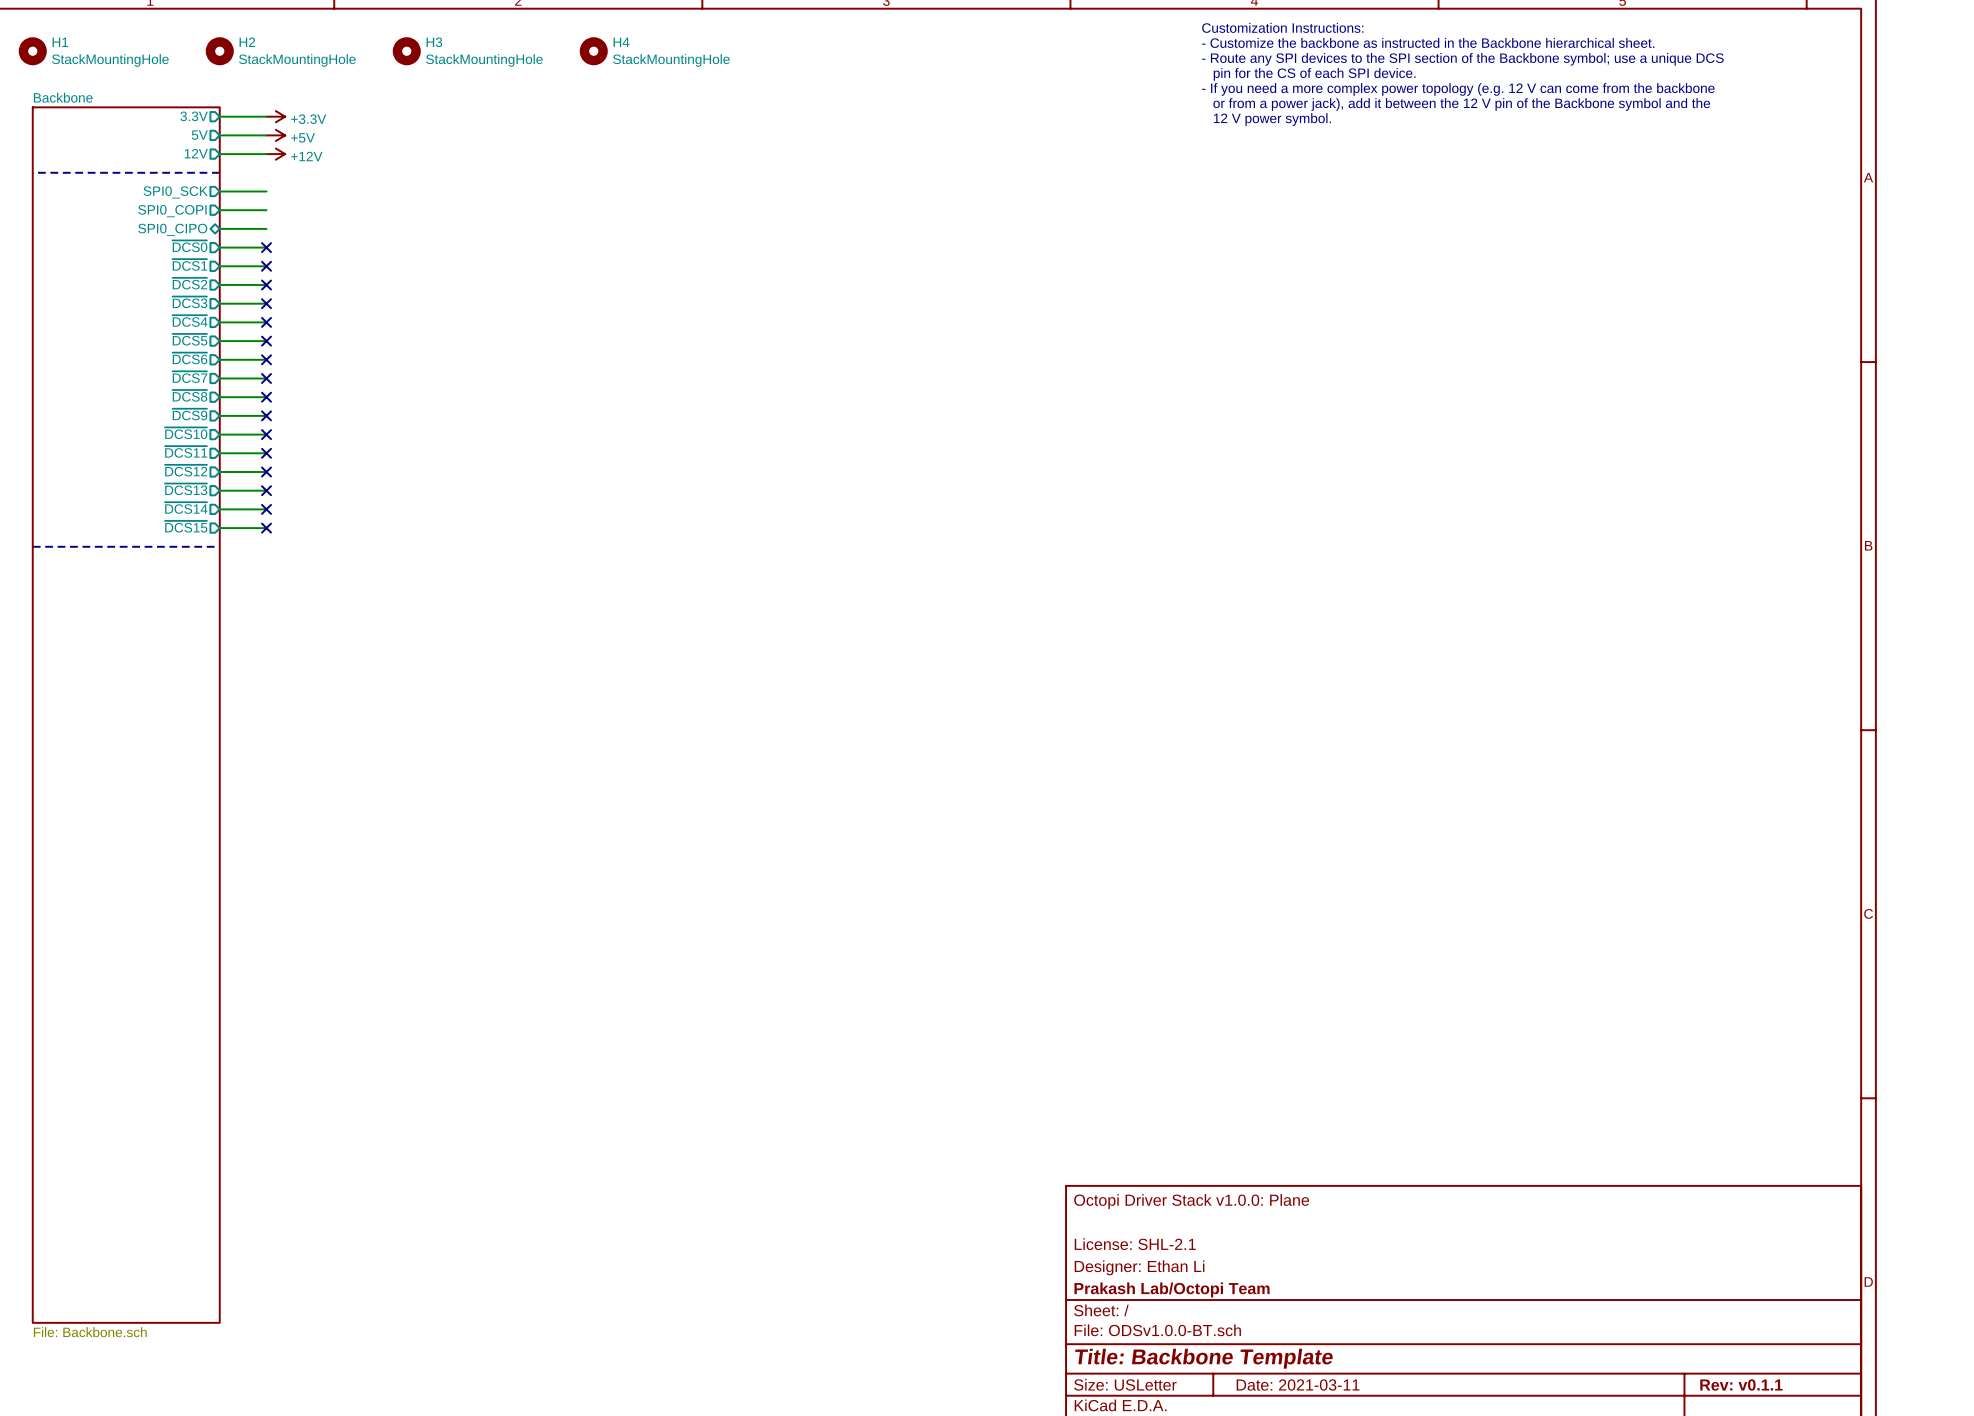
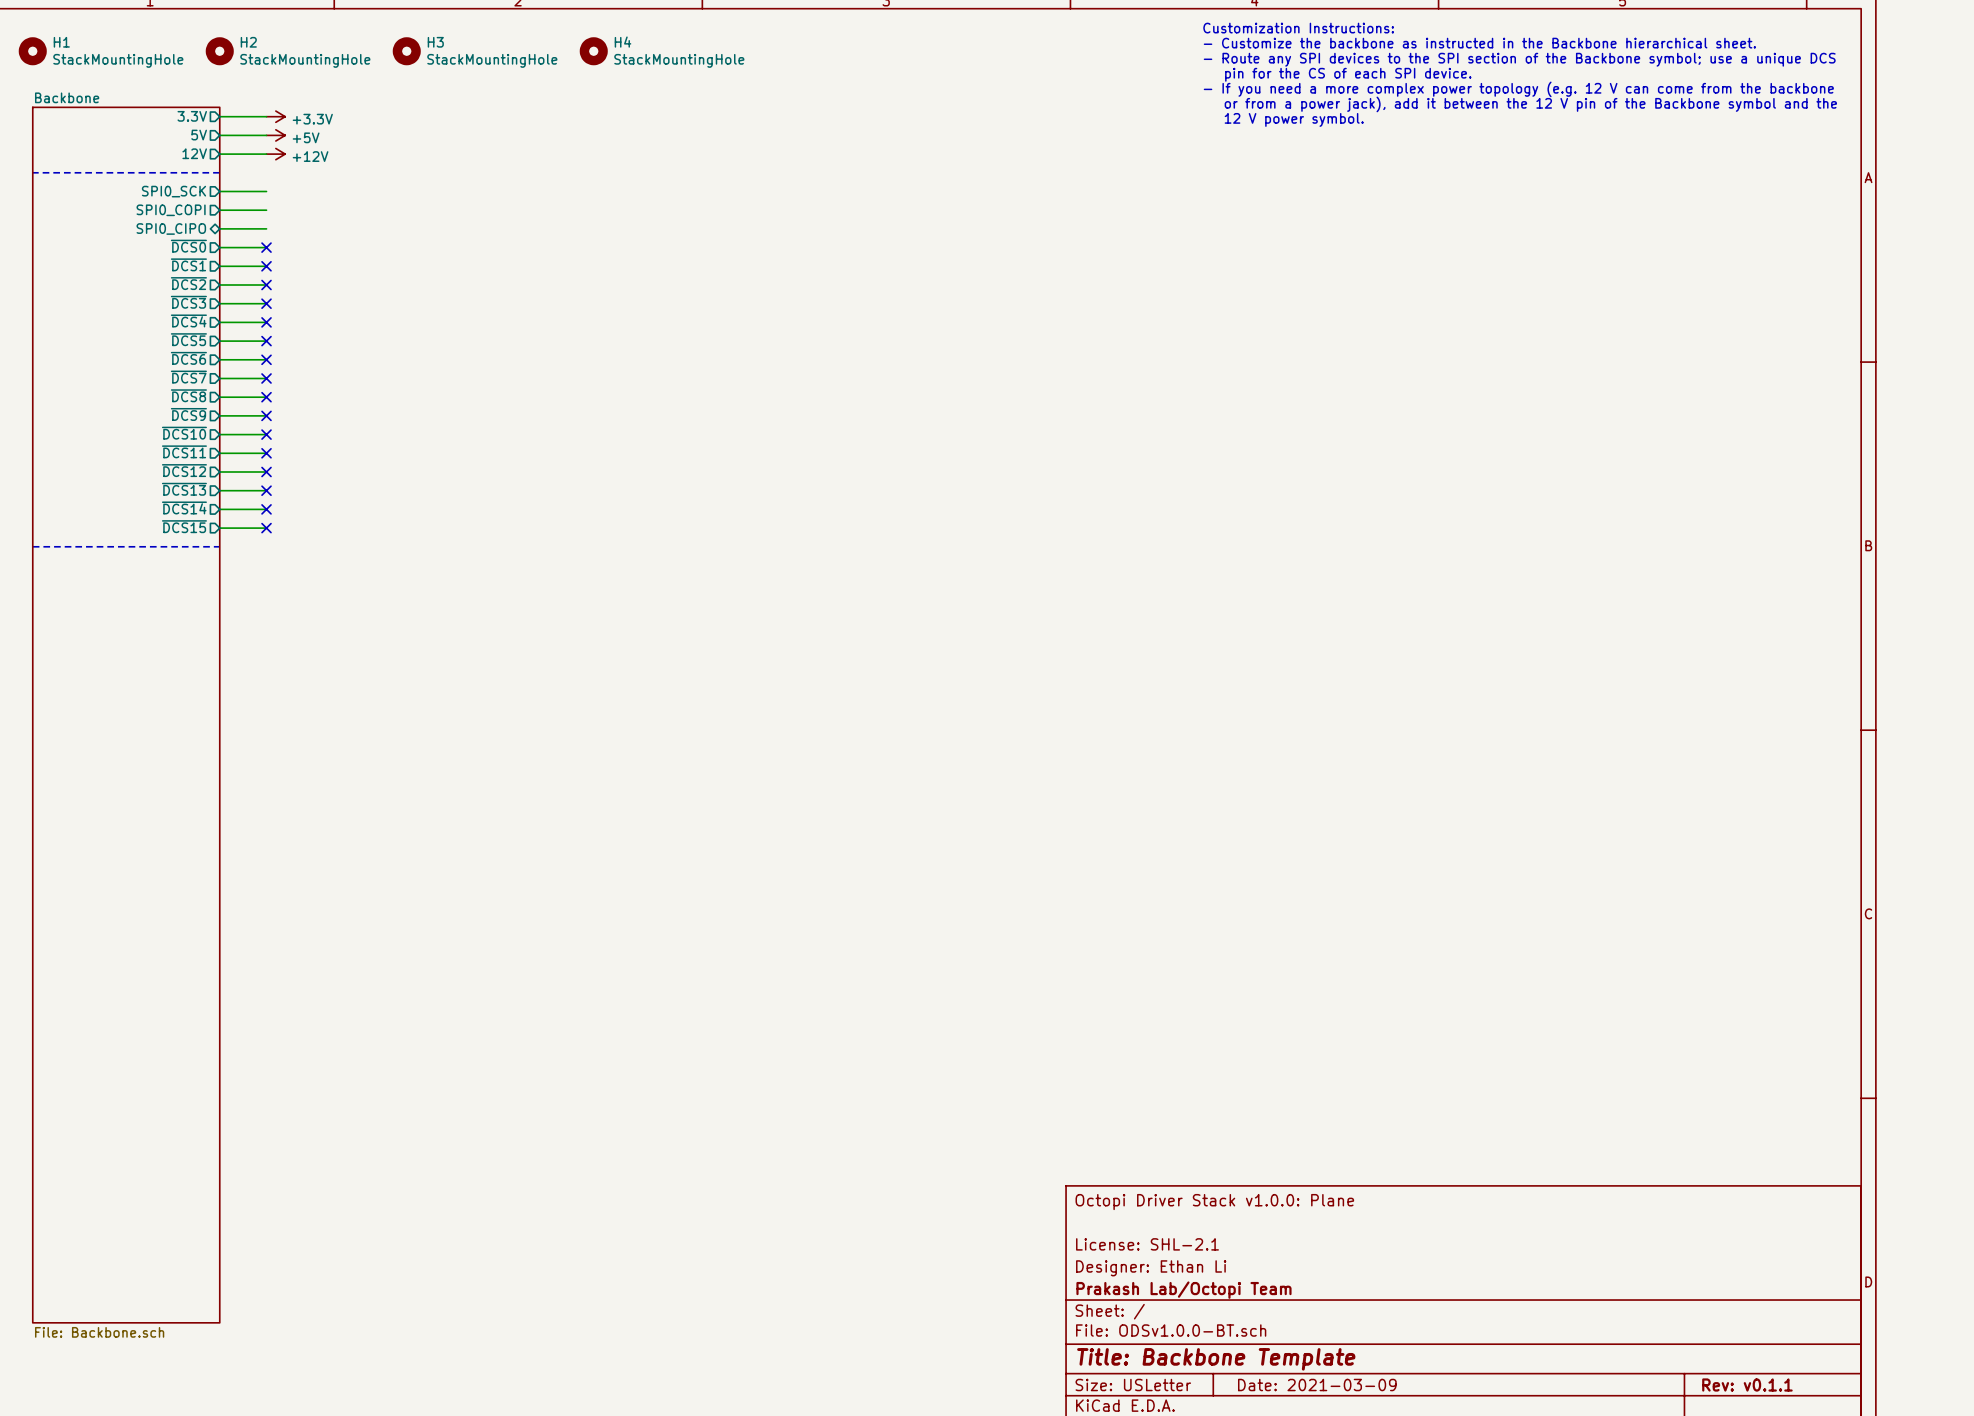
title block: Date: 2021-03-11 (1298, 1385) -> Date: 2021-03-09 (1317, 1385)

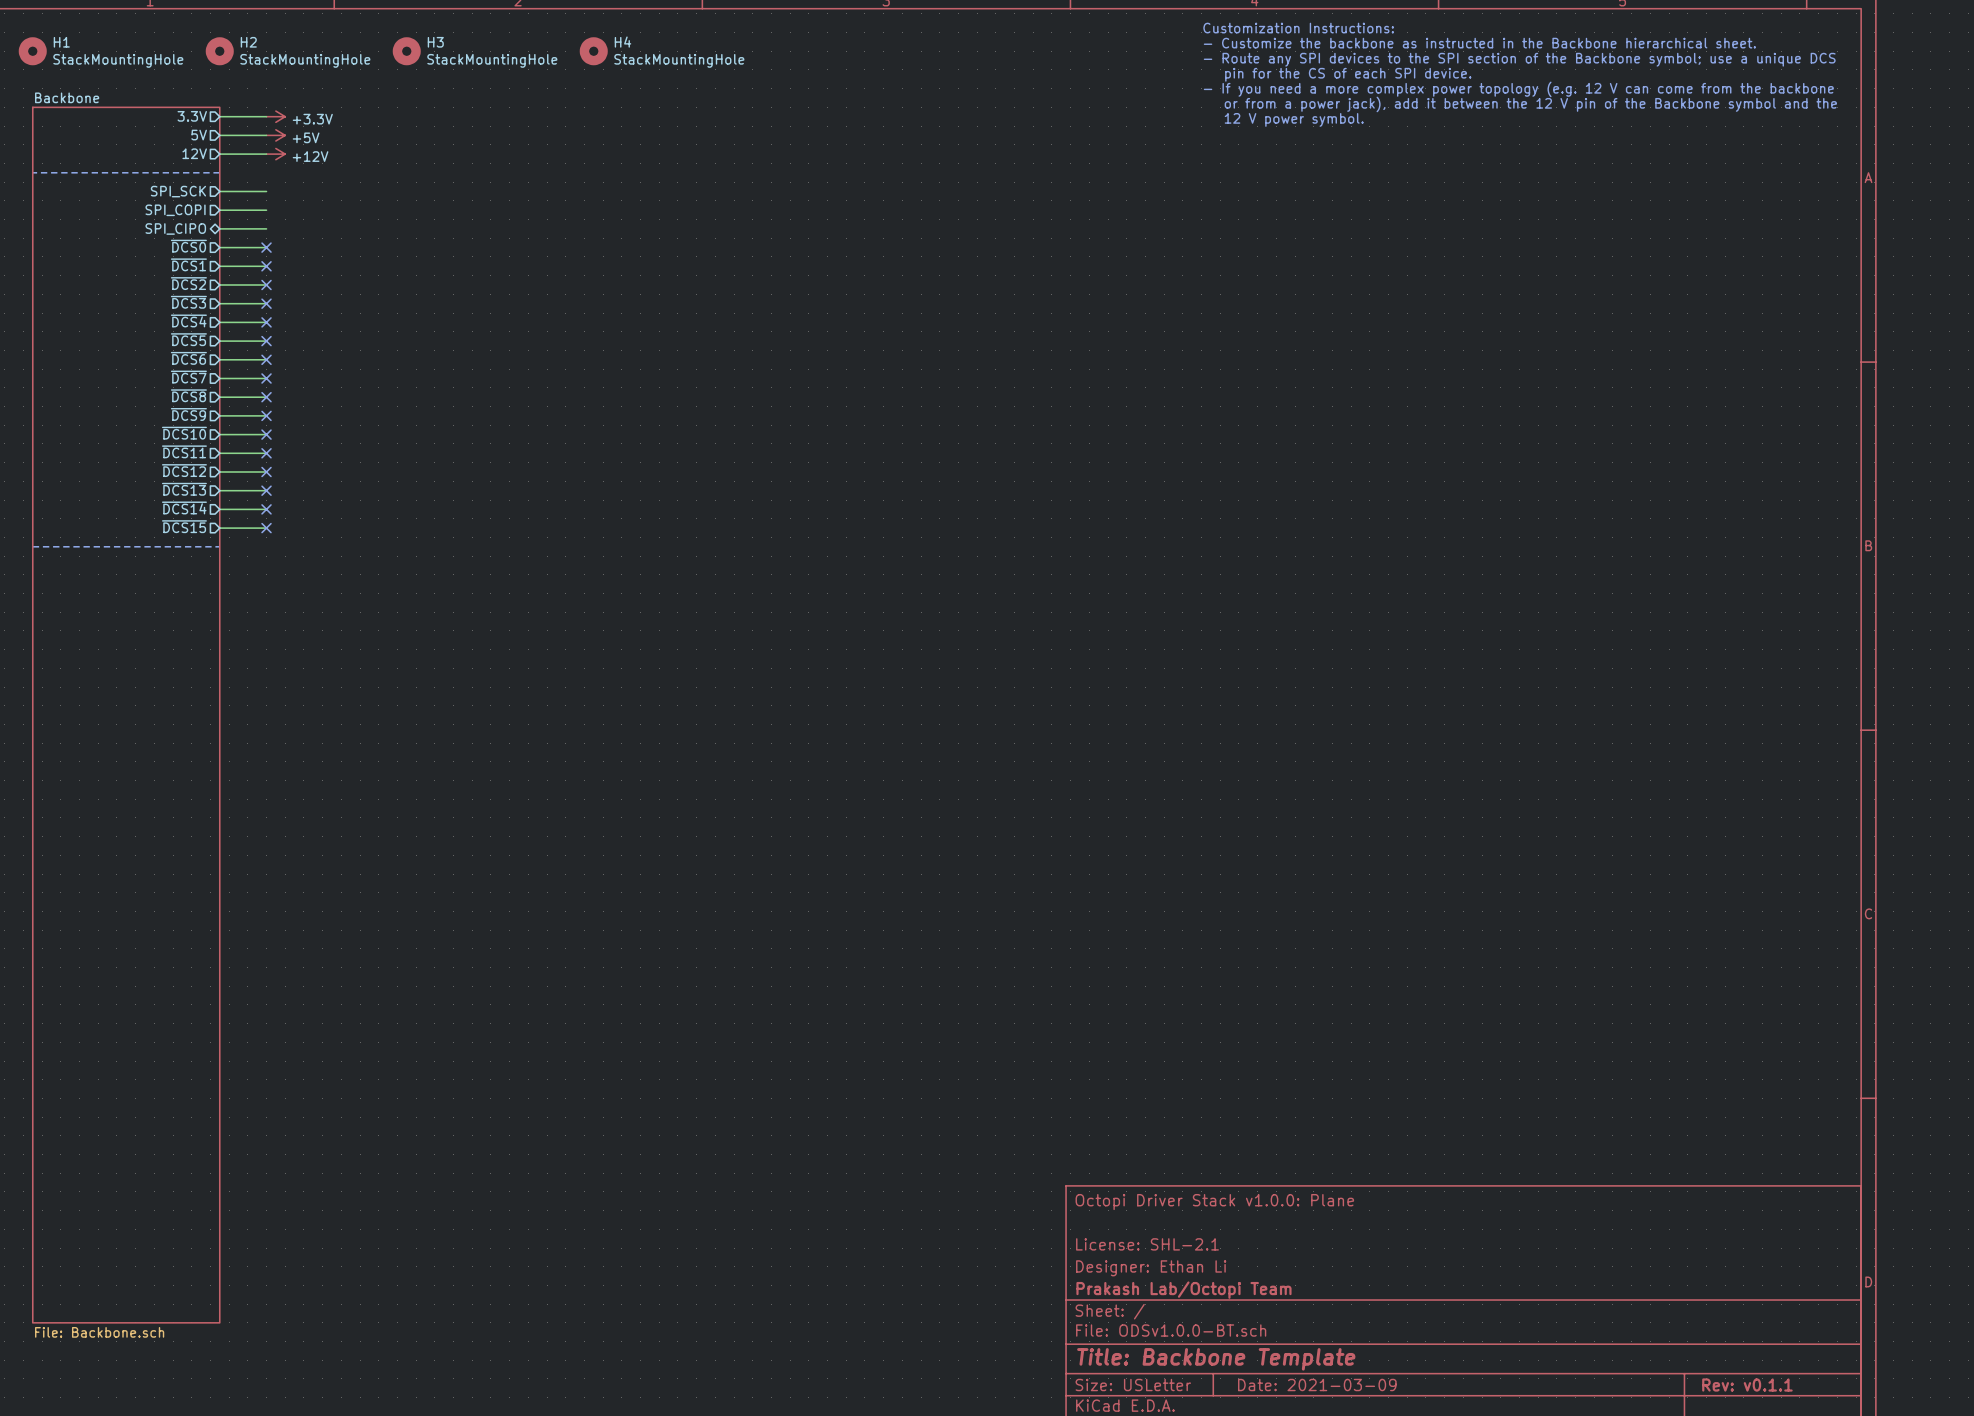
sheet pin: SPI0_SCK (173, 191) -> SPI_SCK (178, 191)
sheet pin: SPI0_COPI (171, 210) -> SPI_COPI (175, 210)
sheet pin: SPI0_CIPO (171, 228) -> SPI_CIPO (175, 228)

